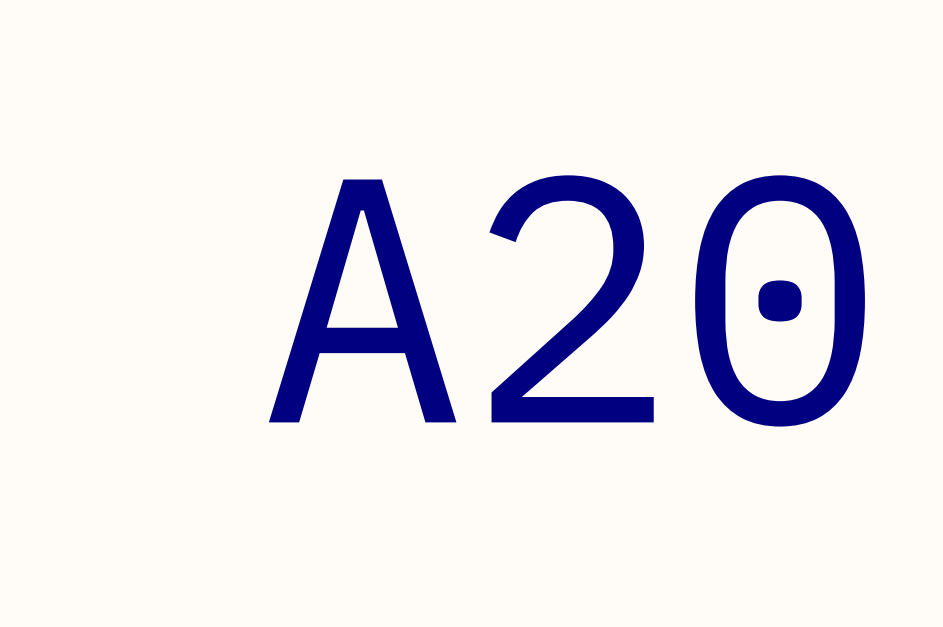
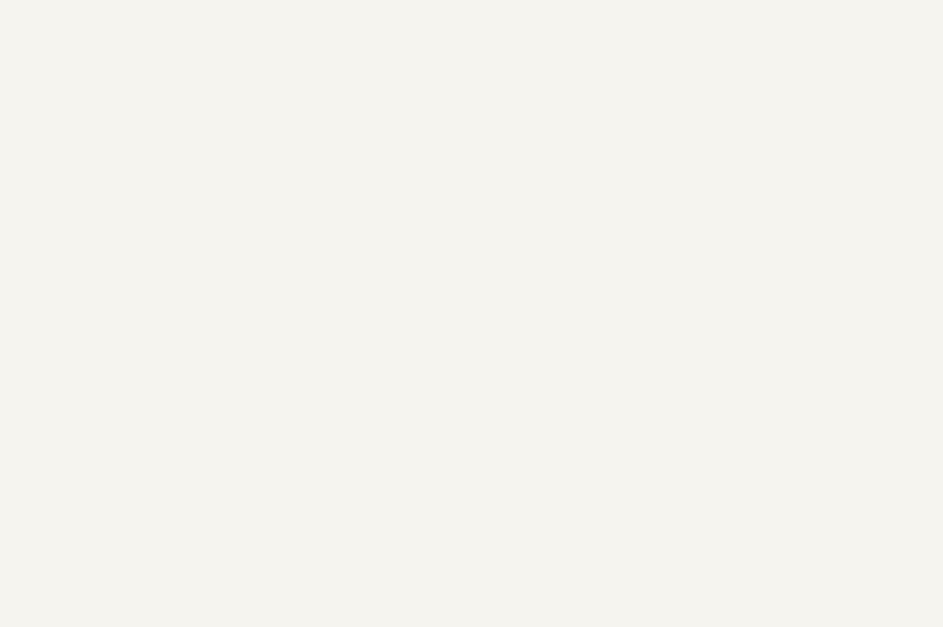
text: A20 (566, 300) -> none

